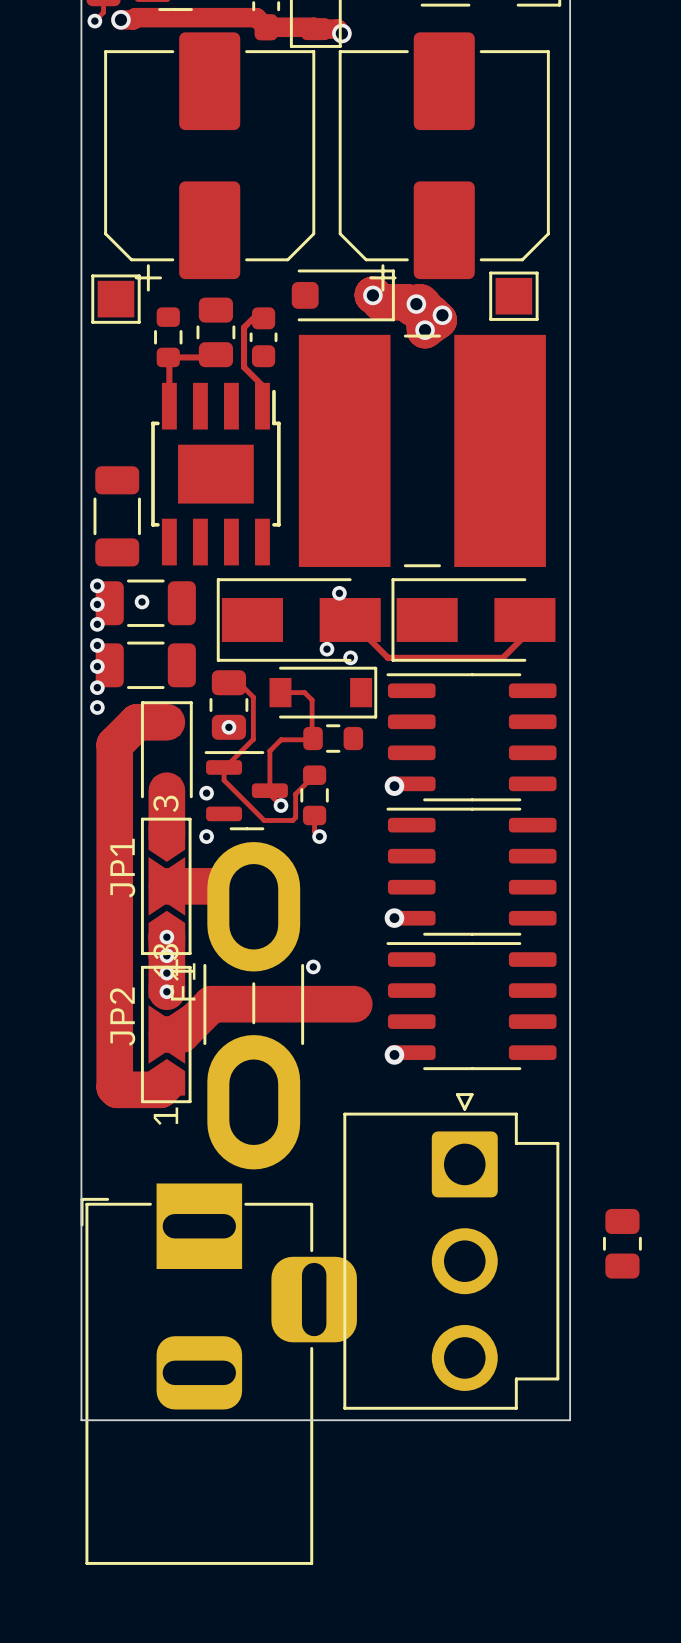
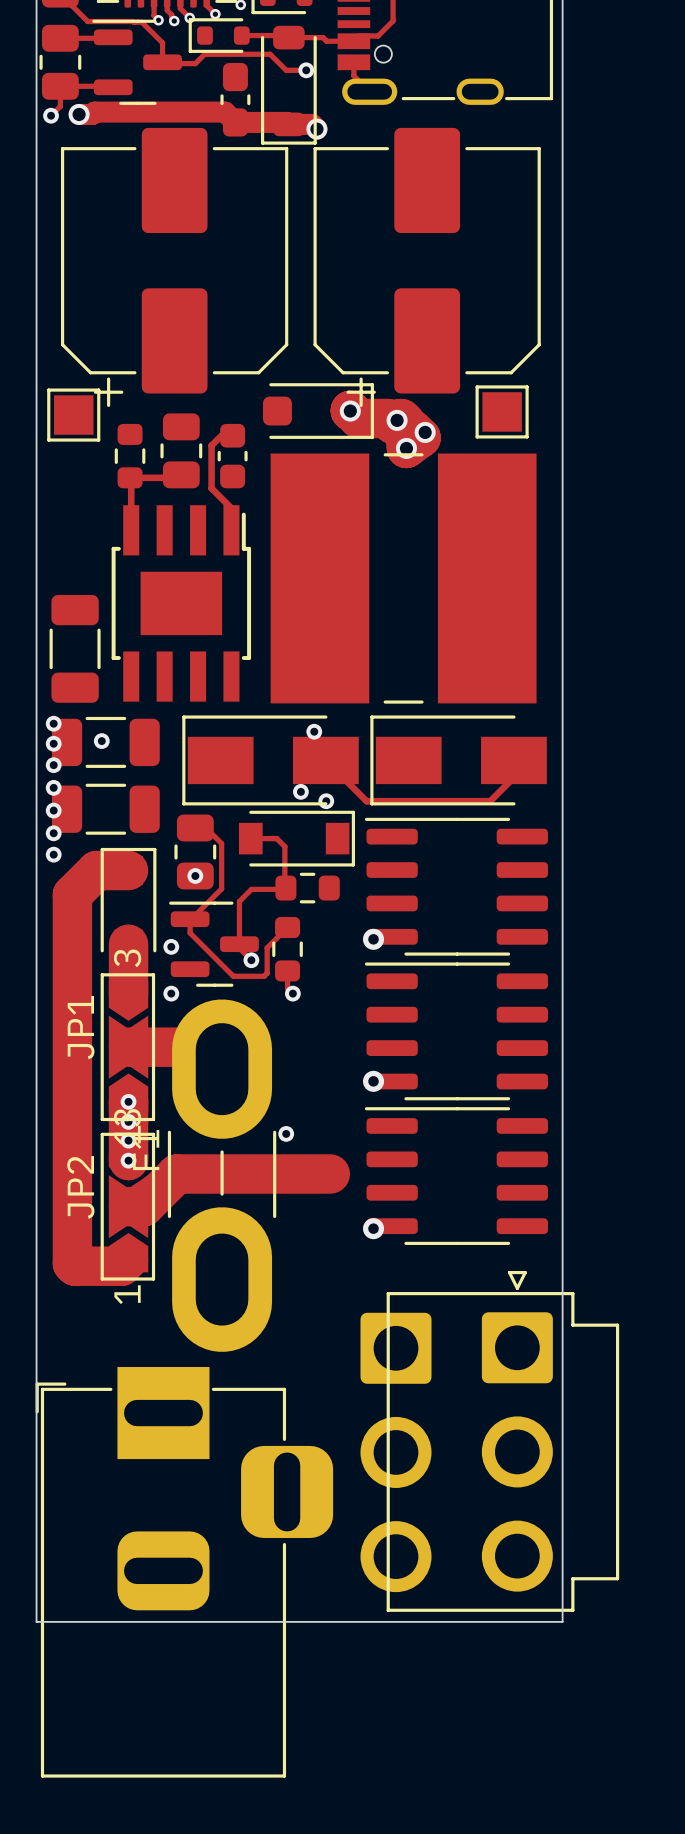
part: (622, 1243) -> none
part position: (451, 1251) -> (502, 1441)
part: none -> (396, 1452)

